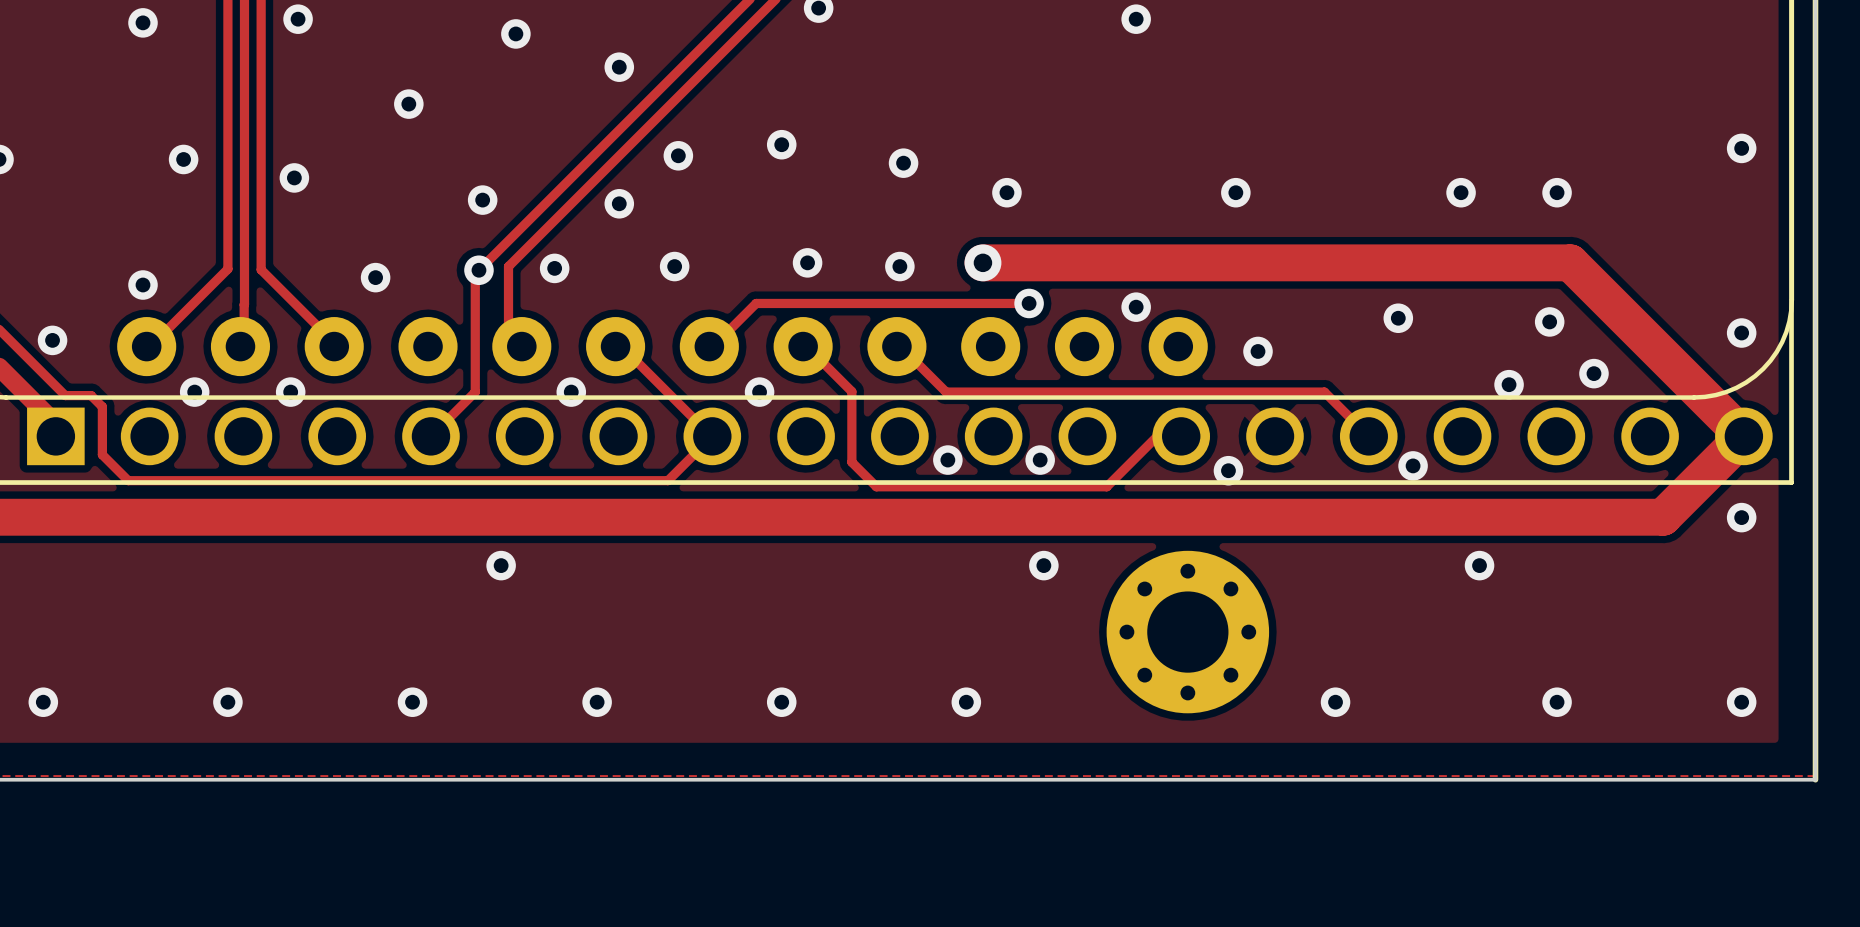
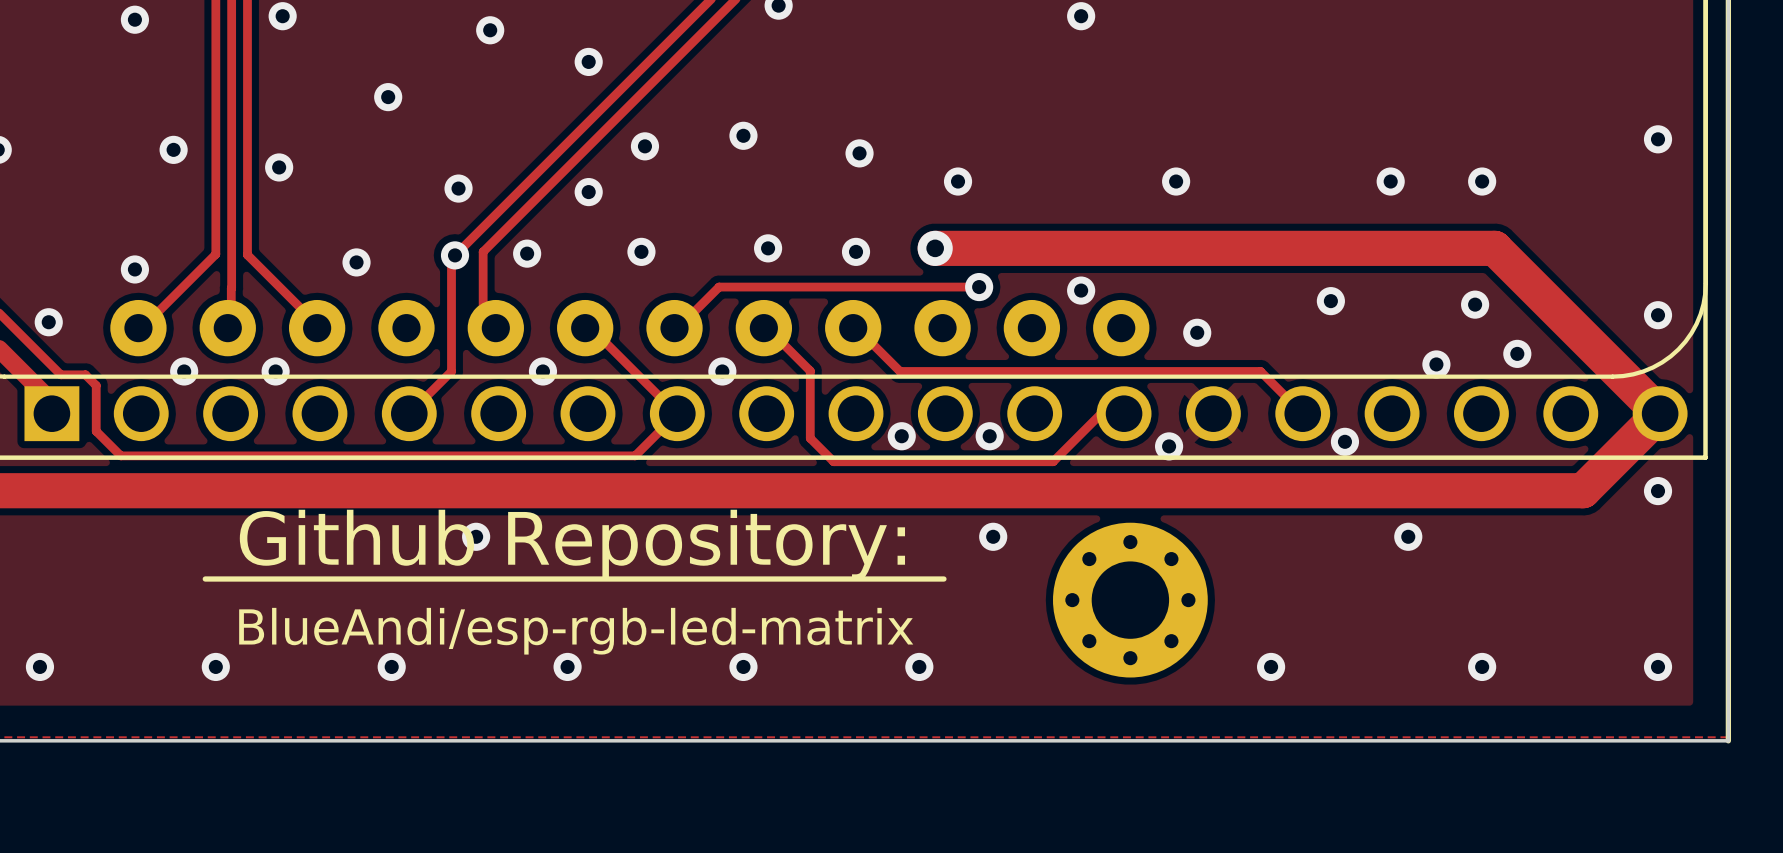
text: none -> Github Repository: (572, 544)
line: none -> (205, 579) (943, 579)
text: none -> BlueAndi/esp-rgb-led-matrix (576, 631)

